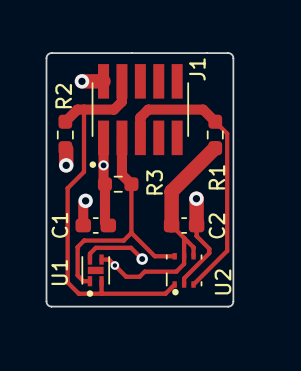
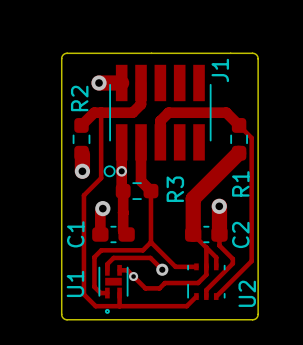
J1 footprint: [91, 64, 190, 156] -> [103, 64, 212, 178]
drawing: [89, 161, 97, 168] -> none
U1 footprint: [81, 254, 111, 287] -> [98, 264, 129, 314]
drawing: [172, 288, 179, 296] -> none
drawing: [86, 290, 94, 297] -> none

